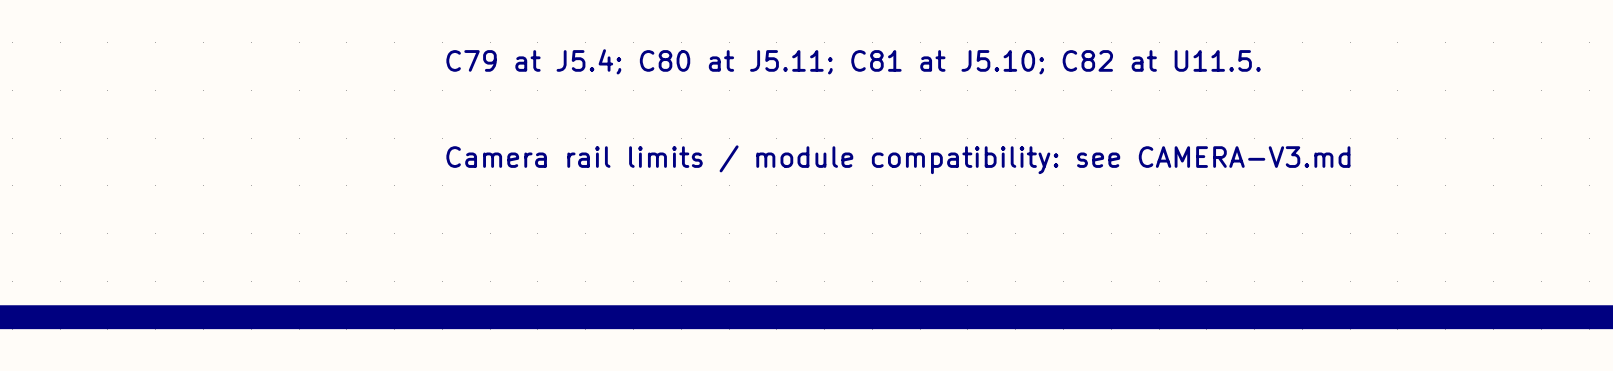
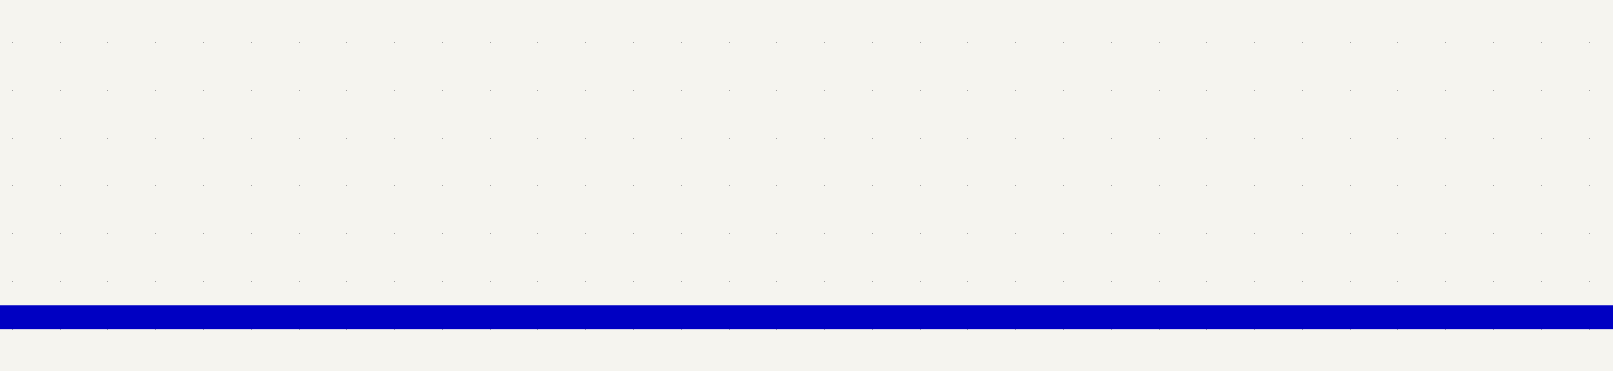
text: C79 at J5.4; C80 at J5.11; C81 at J5.10; C82 at U11.5. (853, 61) -> none
text: Camera rail limits / module compatibility: see CAMERA-V3.md (898, 159) -> none

